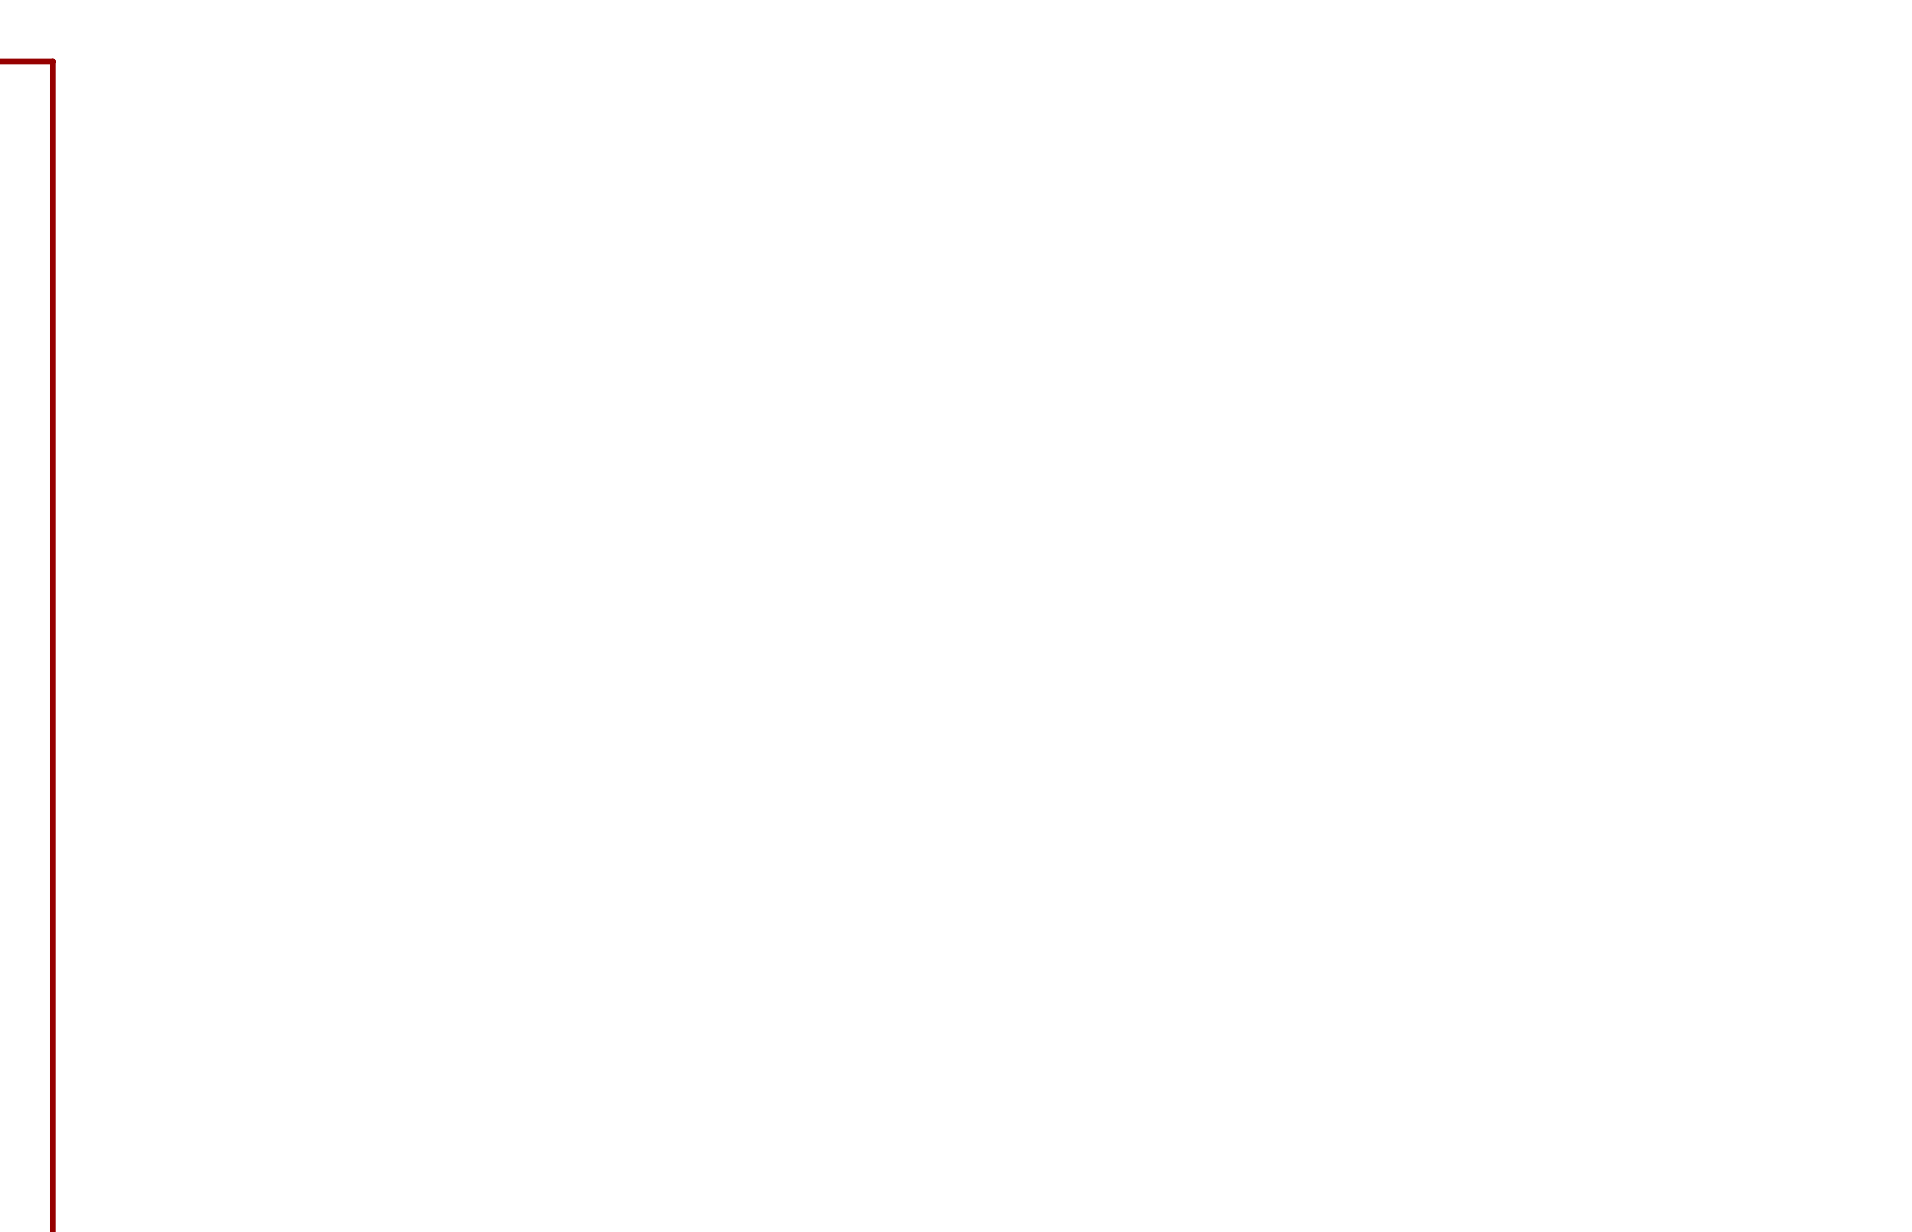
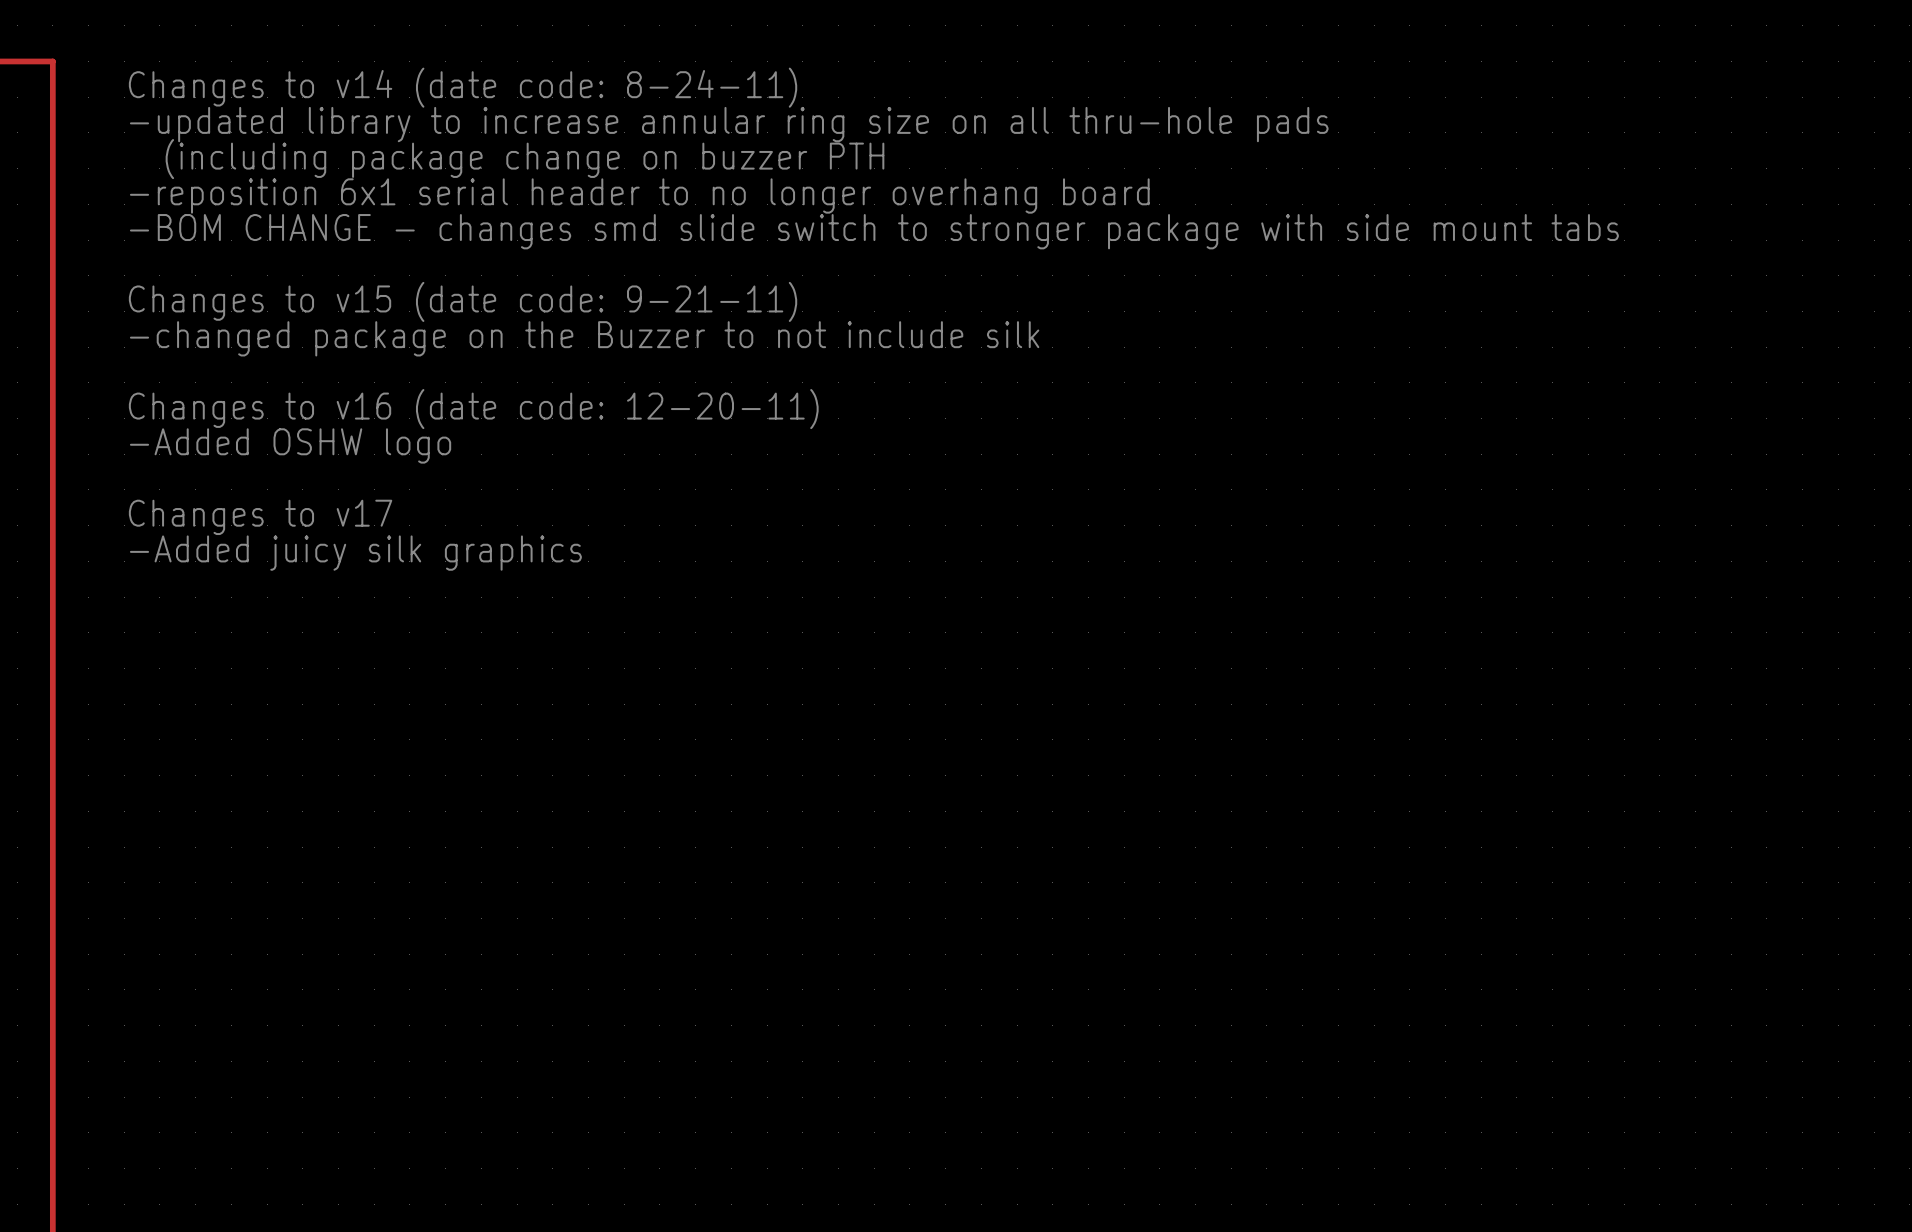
text: none -> Changes to v14 (date code: 8-24-11) (463, 87)
text: none -> -updated library to increase annular ring size on all thru-hole pads (729, 124)
text: none -> (including package change on buzzer PTH (524, 159)
text: none -> -reposition 6x1 serial header to no longer overhang board (639, 195)
text: none -> -BOM CHANGE - changes smd slide switch to stronger package with side mount tabs (874, 231)
text: none -> Changes to v15 (date code: 9-21-11) (463, 301)
text: none -> -changed package on the Buzzer to not include silk (584, 338)
text: none -> Changes to v16 (date code: 12-20-11) (473, 409)
text: none -> -Added OSHW logo (290, 445)
text: none -> Changes to v17 (260, 517)
text: none -> -Added juicy silk graphics (355, 553)

